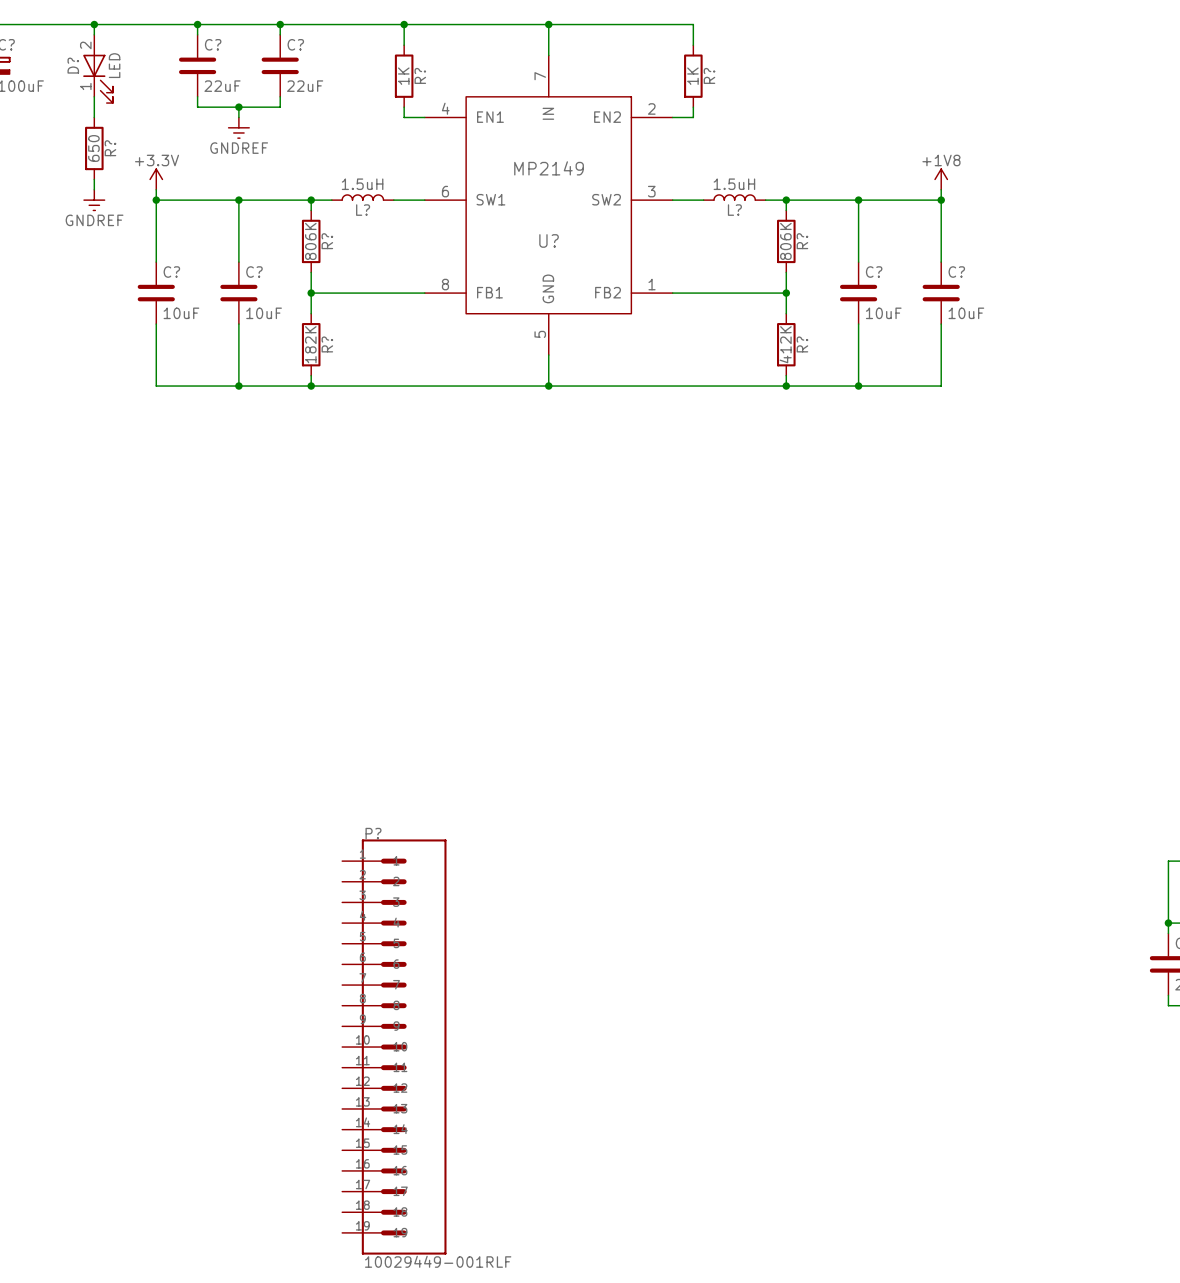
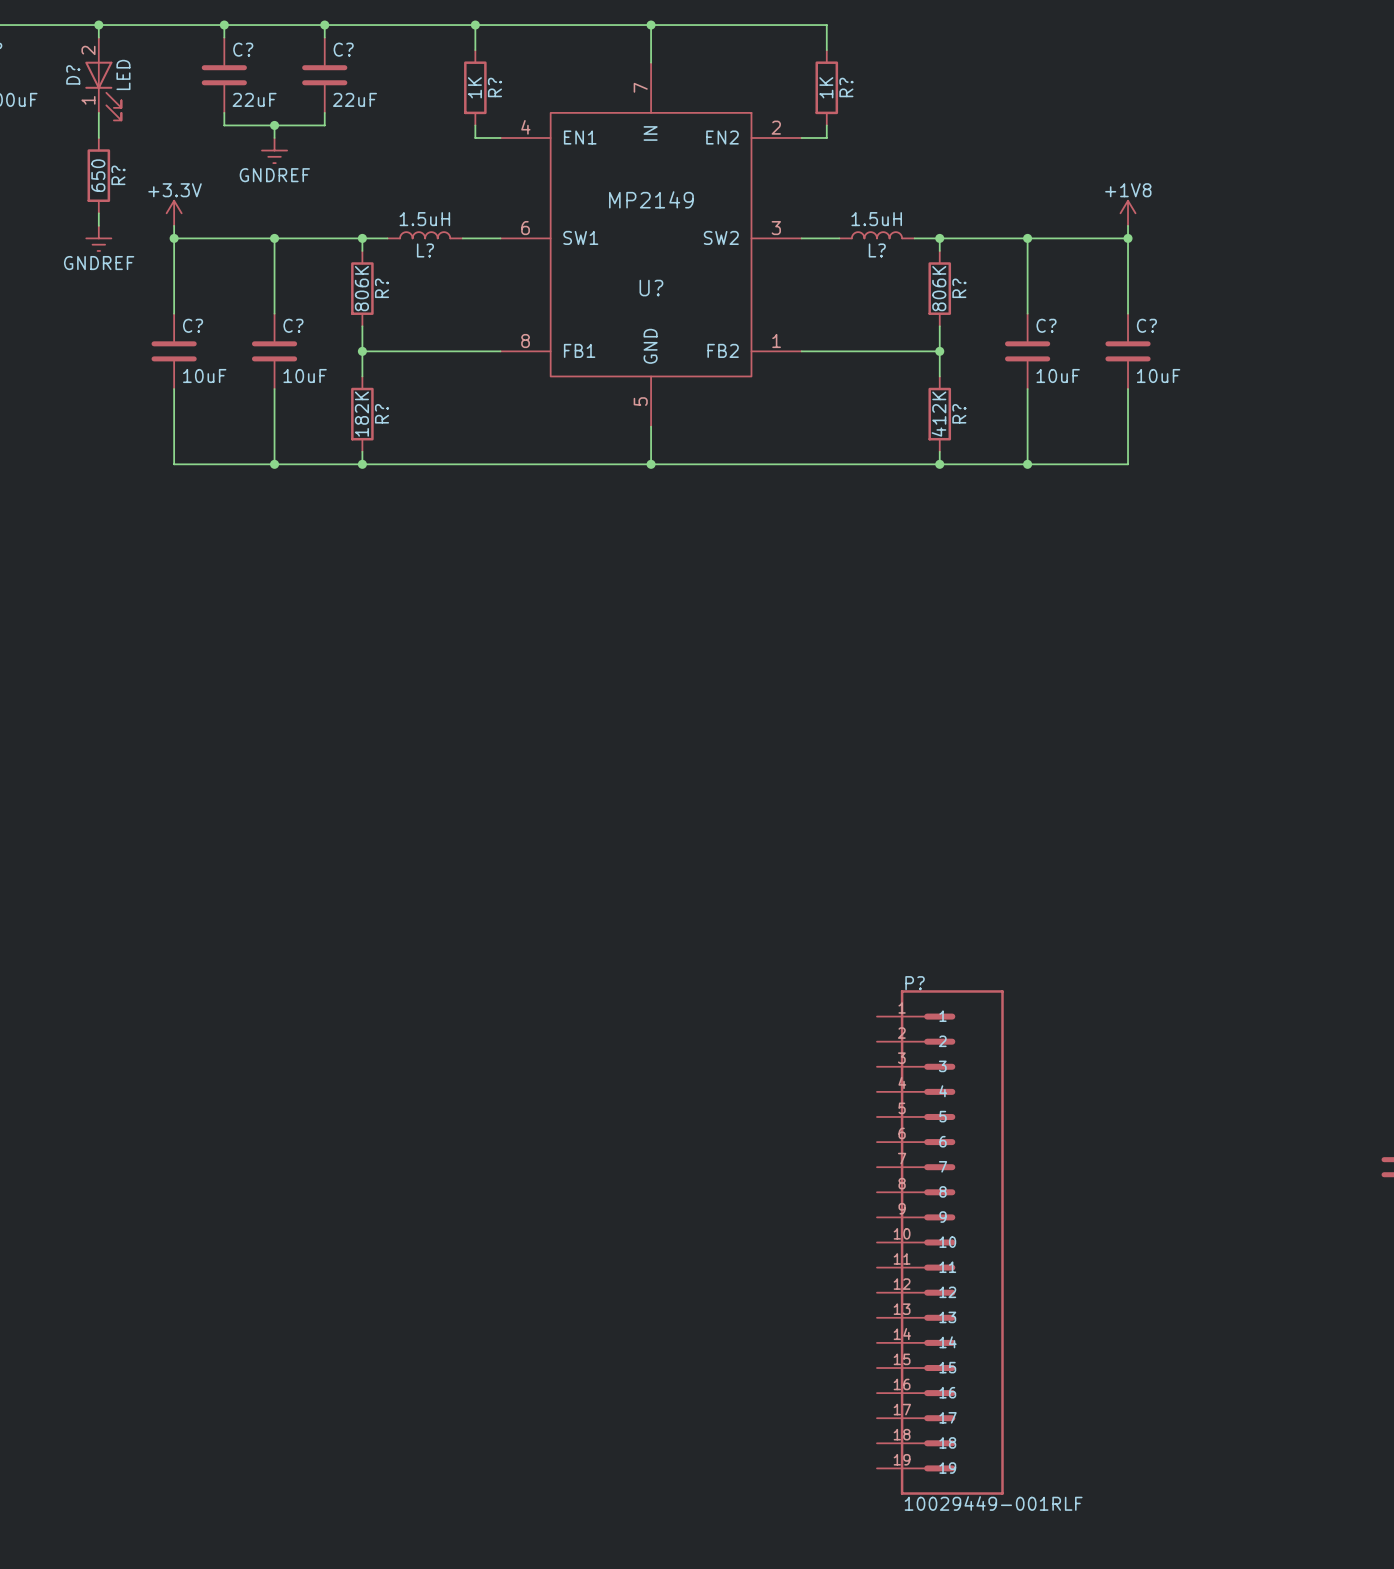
P?: none -> 10029449-001RLF (940, 1242)
P?: 10029449-001RLF (394, 1047) -> none

